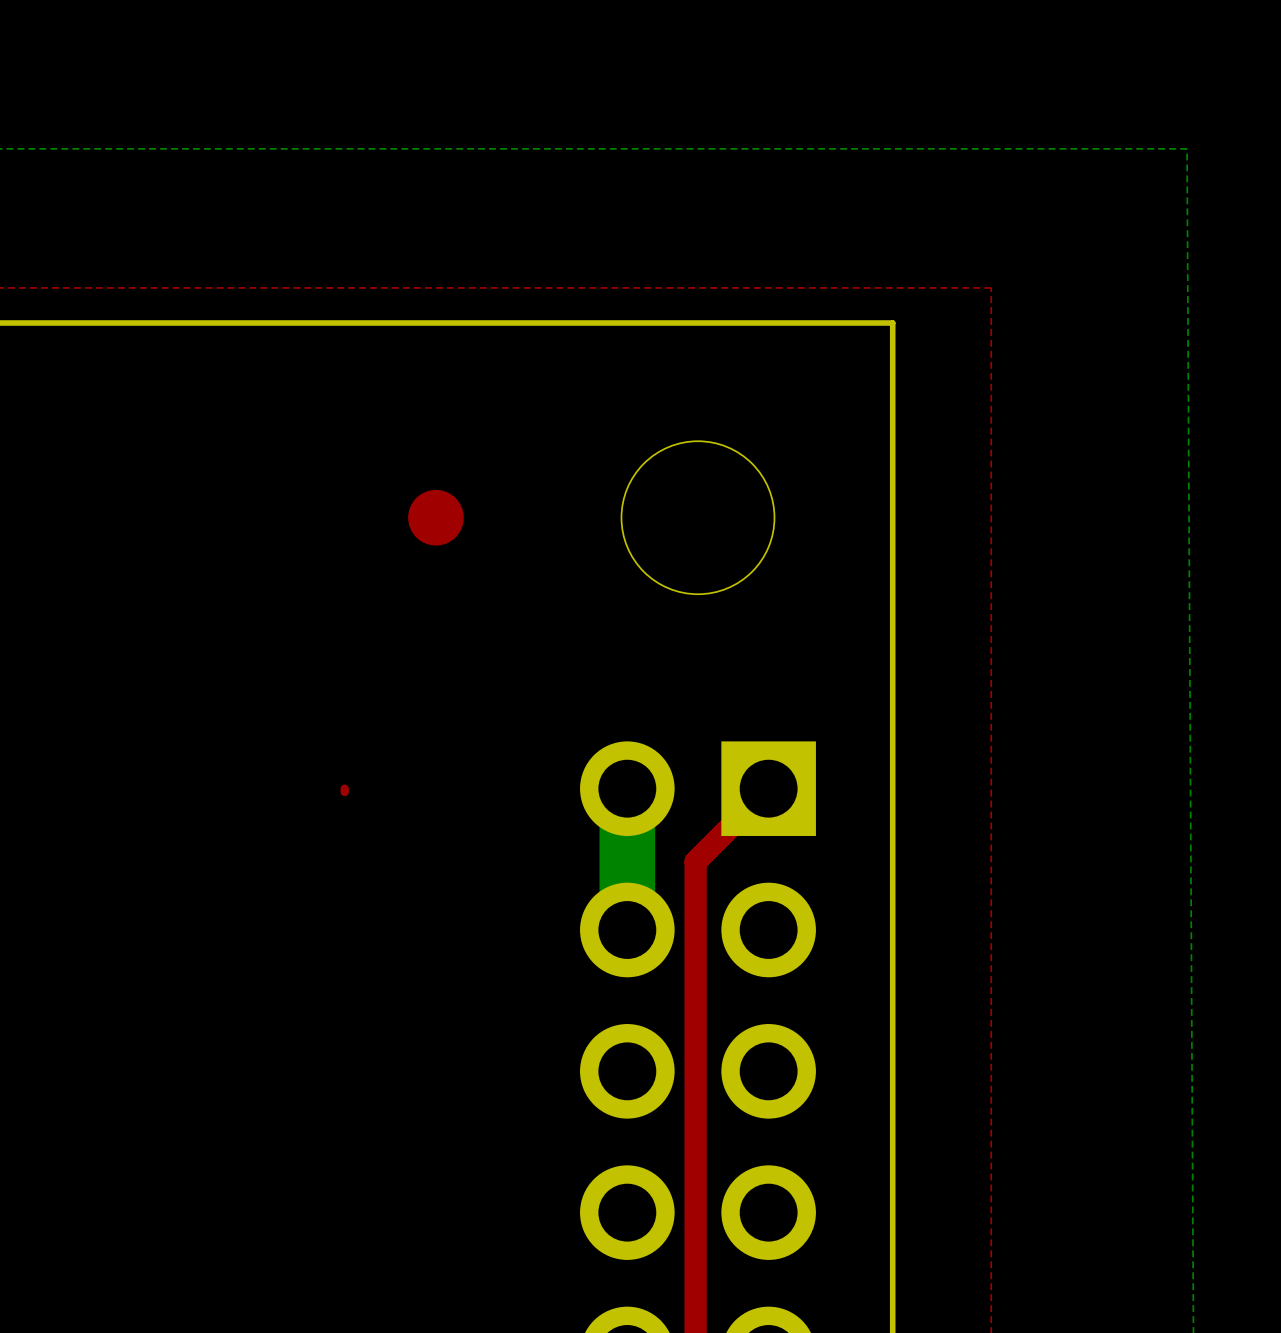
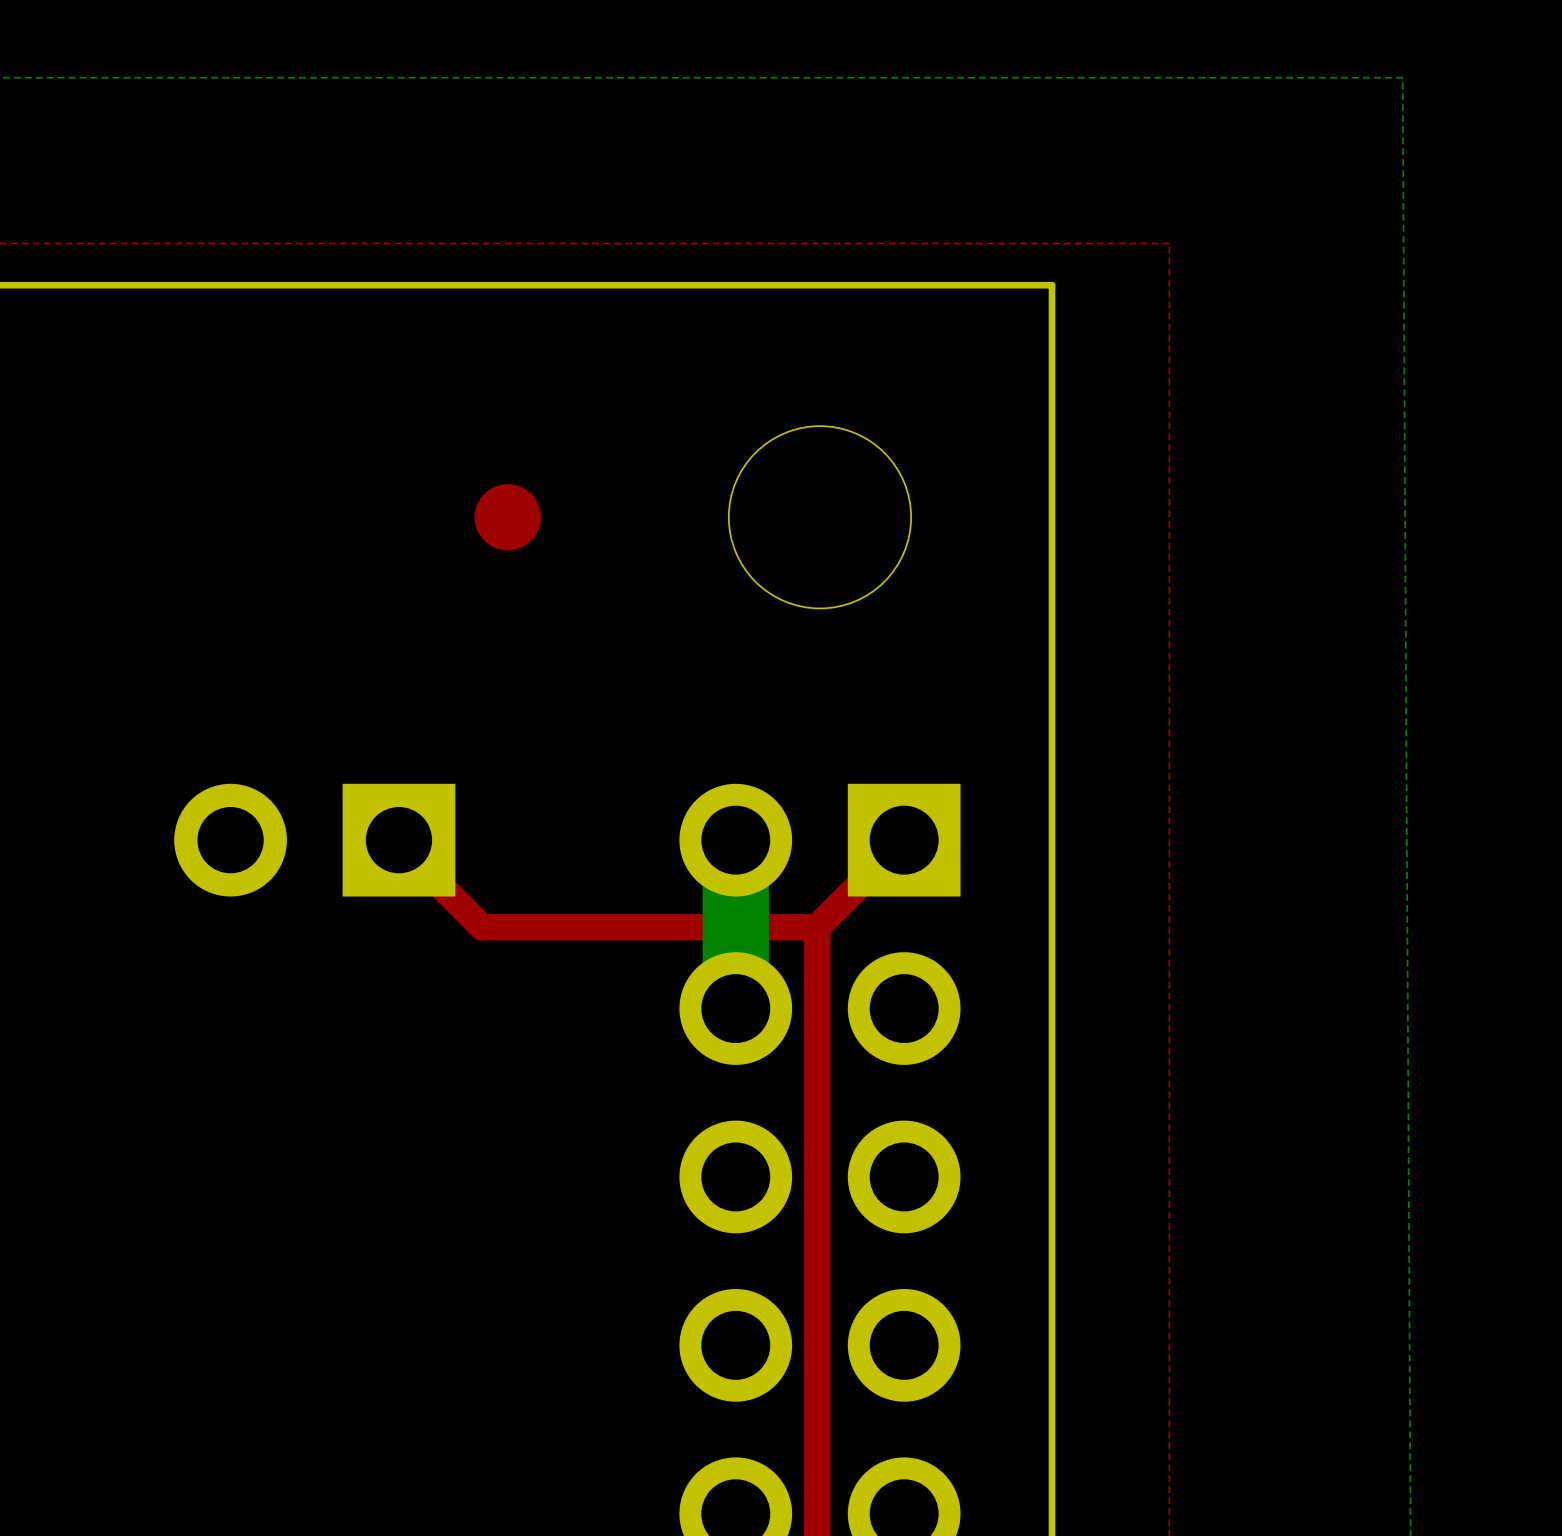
part: none -> (314, 840)
top track: none -> (398, 844) (482, 927) (817, 927)

